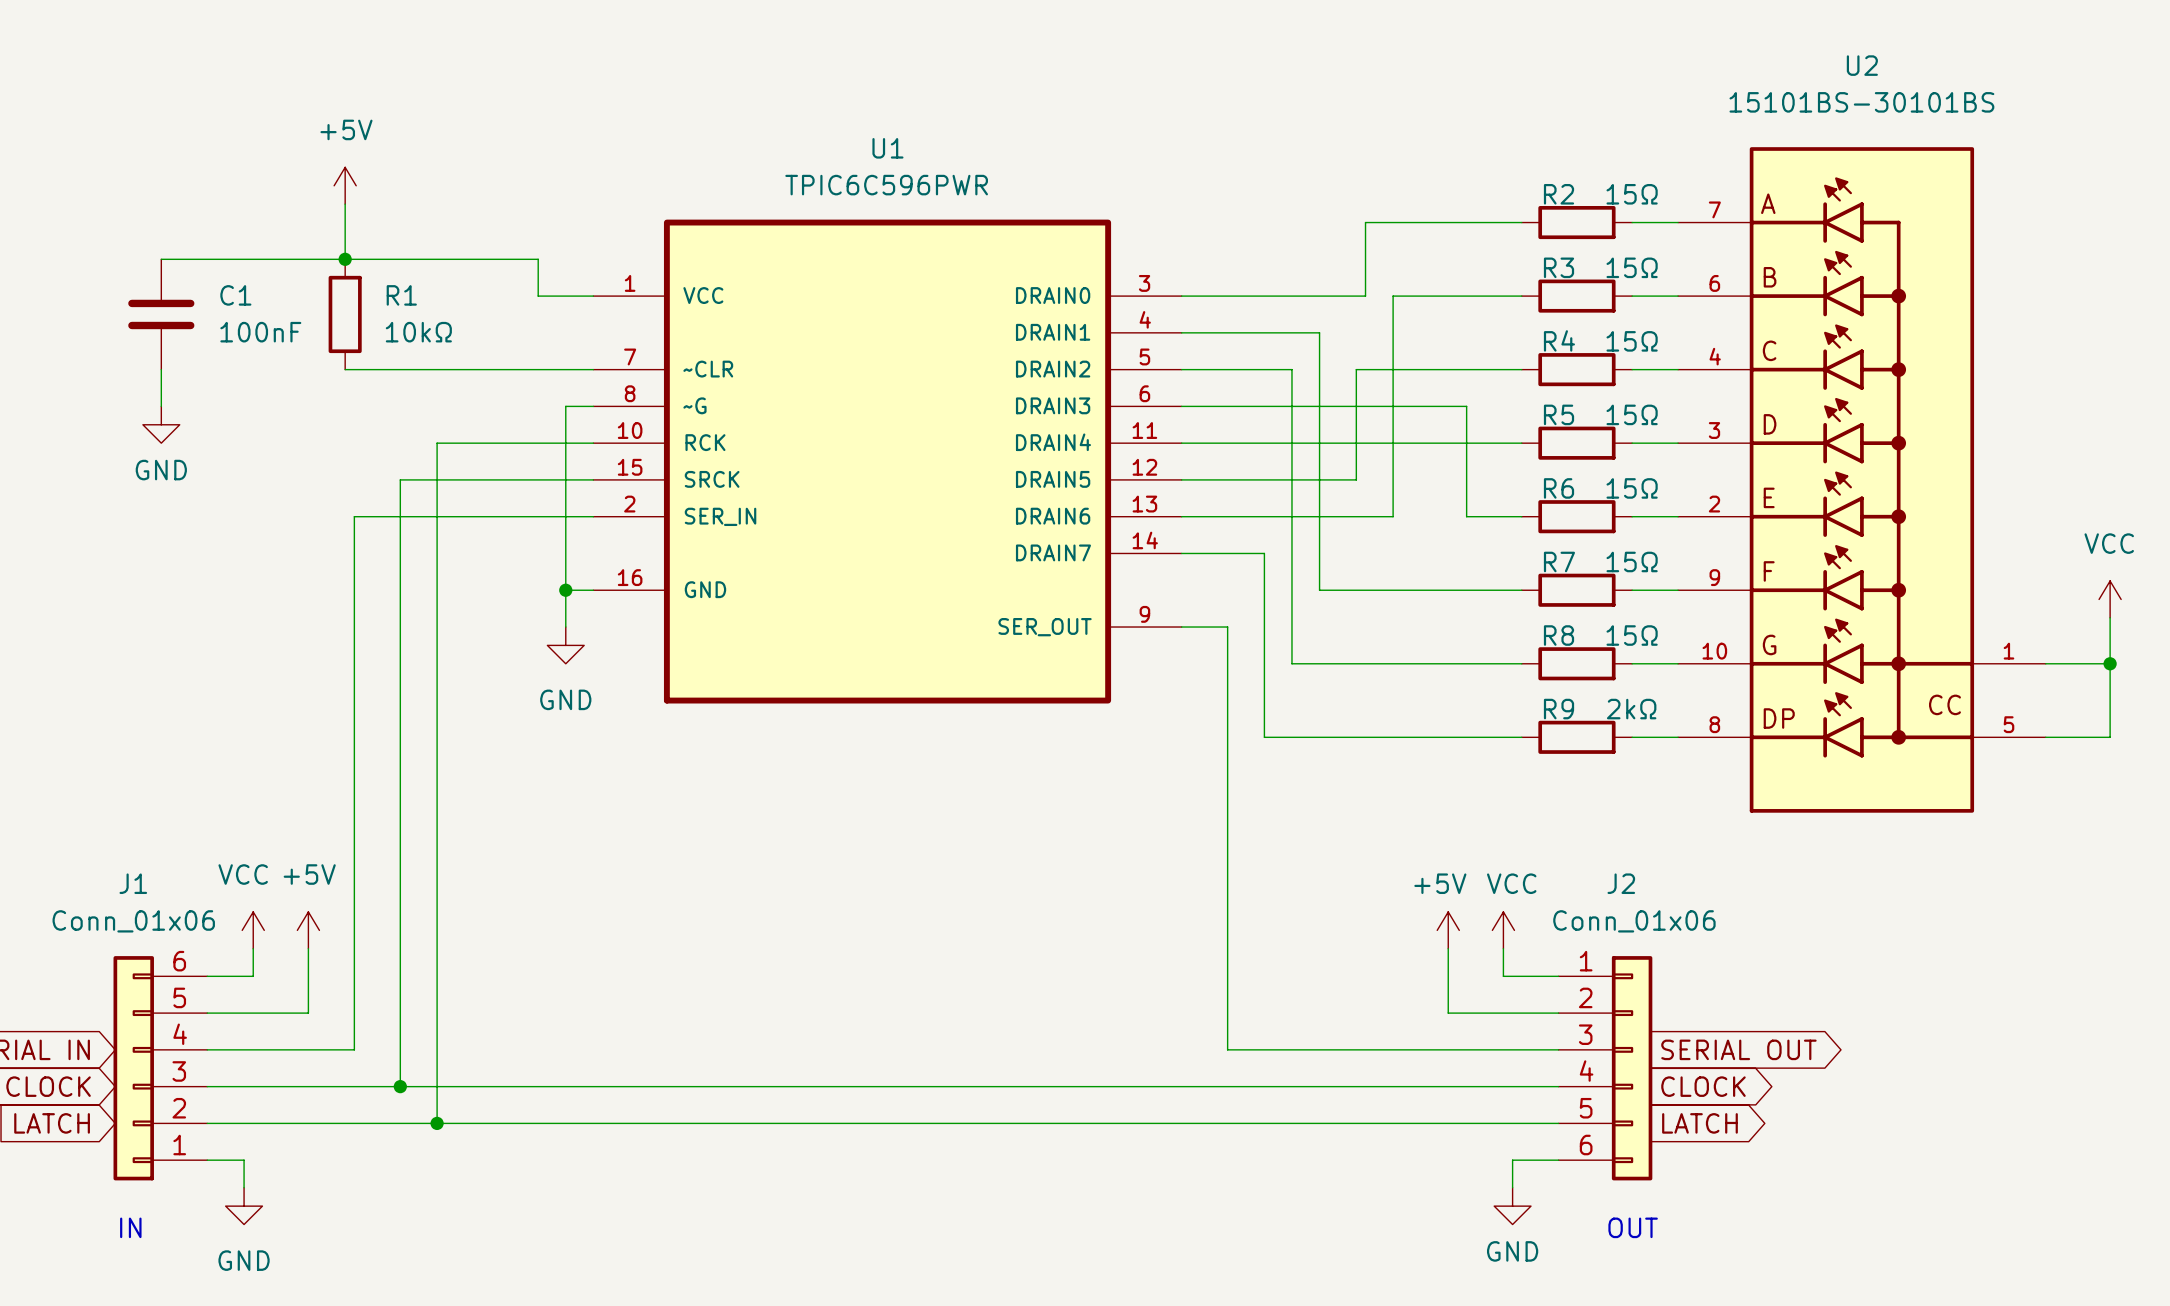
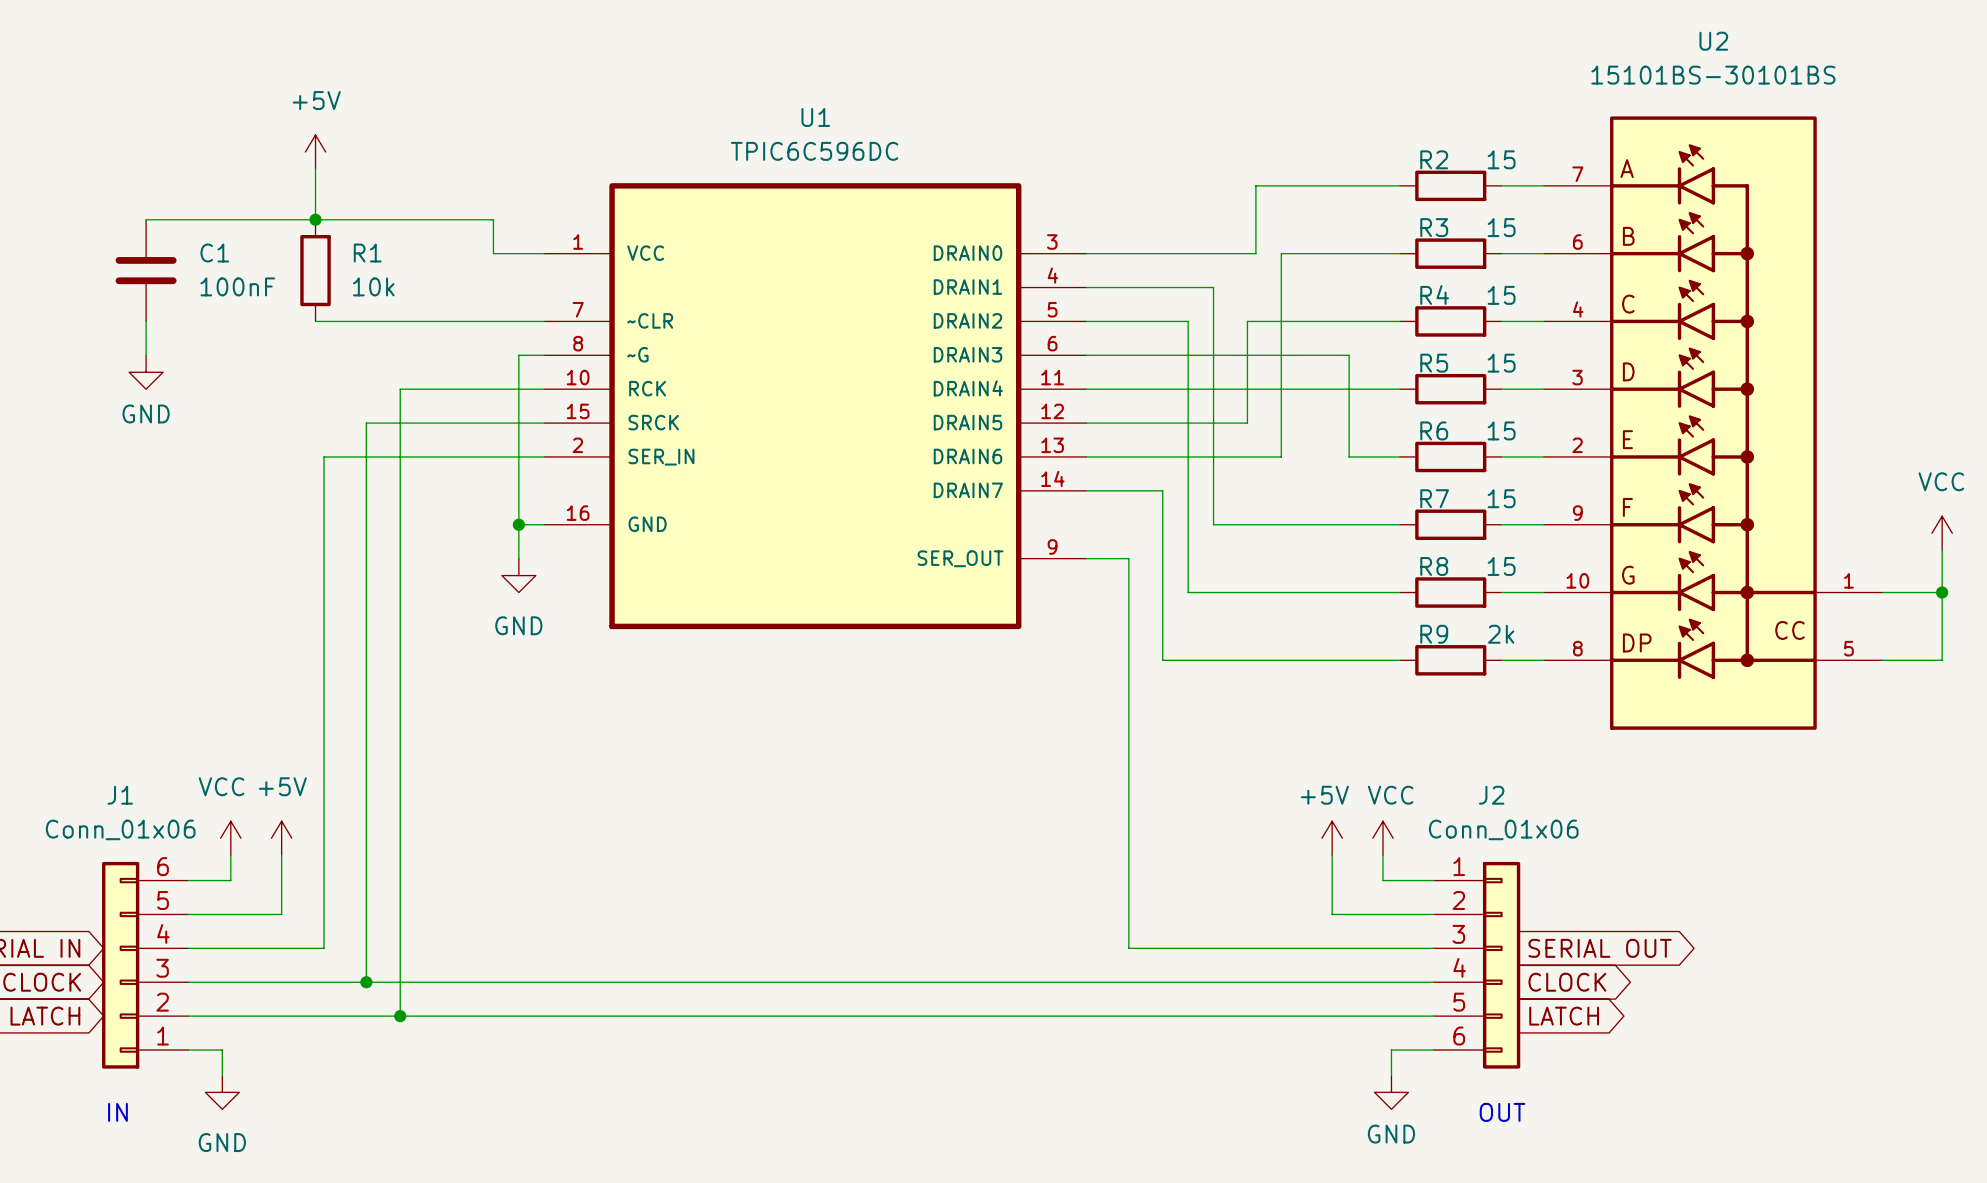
U1 value: TPIC6C596PWR (886, 185) -> TPIC6C596DC (814, 151)
R2 value: 15Ω (1632, 194) -> 15 (1501, 159)
R3 value: 15Ω (1632, 267) -> 15 (1501, 227)
R1 value: 10kΩ (418, 332) -> 10k (373, 286)
R4 value: 15Ω (1632, 341) -> 15 (1501, 295)
R5 value: 15Ω (1632, 414) -> 15 (1501, 363)
R6 value: 15Ω (1632, 488) -> 15 (1501, 430)
R7 value: 15Ω (1632, 561) -> 15 (1501, 498)
R8 value: 15Ω (1632, 635) -> 15 (1501, 566)
R9 value: 2kΩ (1631, 709) -> 2k (1501, 634)

